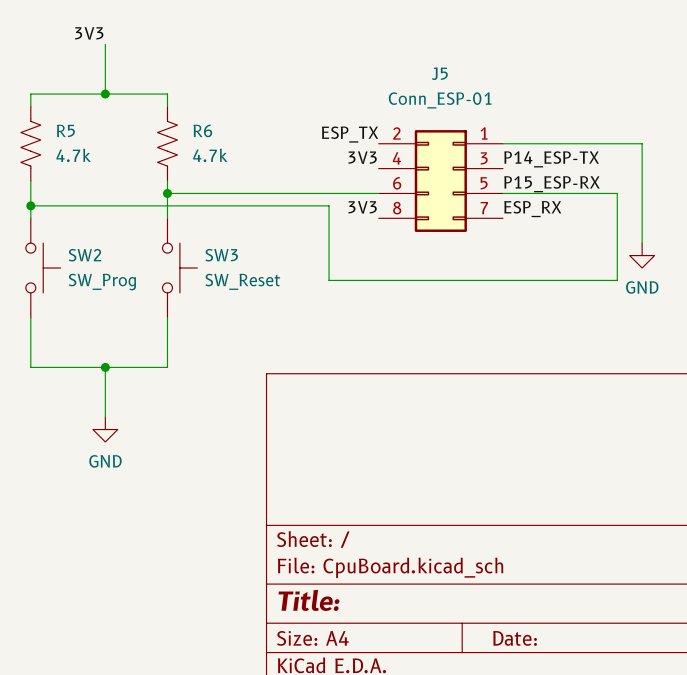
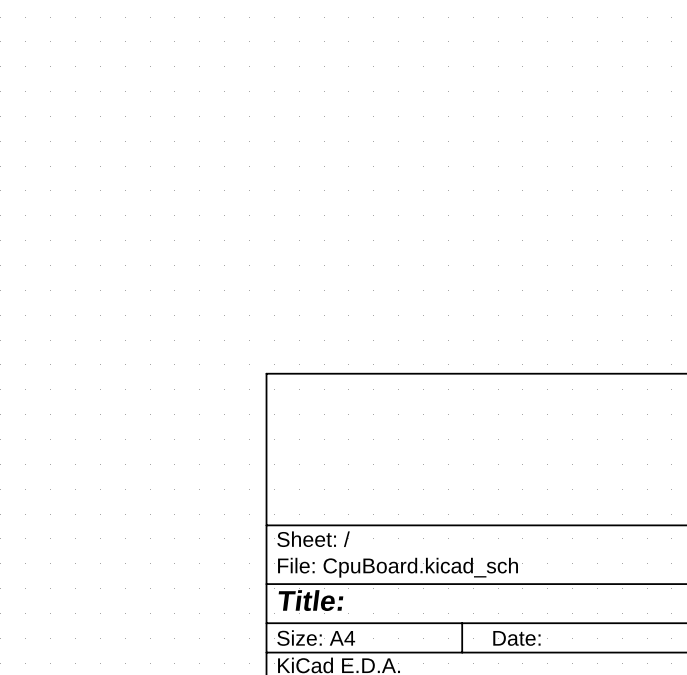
label: 3V3 (89, 33) -> none
wire: (105, 44) (105, 94) -> none
junction: (105, 94) -> none
wire: (30, 106) (30, 94) (167, 94) (167, 106) -> none
label: ESP_TX (350, 134) -> none
R5: 4.7k (30, 143) -> none
R6: 4.7k (167, 143) -> none
wire: (502, 143) (642, 143) (642, 243) -> none
label: 3V3 (362, 157) -> none
label: P14_ESP-TX (551, 159) -> none
wire: (30, 181) (30, 218) -> none
wire: (167, 181) (167, 218) -> none
J5: Conn_ESP-01 (440, 181) -> none
label: P15_ESP-RX (551, 184) -> none
wire: (167, 193) (378, 193) -> none
junction: (167, 193) -> none
wire: (502, 193) (617, 193) (617, 280) (329, 280) (329, 205) (30, 205) -> none
junction: (30, 205) -> none
label: 3V3 (362, 207) -> none
label: ESP_RX (532, 209) -> none
power symbol: GND (642, 255) -> none
SW2: SW_Prog (43, 268) -> none
SW3: SW_Reset (179, 268) -> none
wire: (30, 317) (30, 367) (167, 367) (167, 317) -> none
wire: (105, 367) (105, 417) -> none
junction: (105, 367) -> none
power symbol: GND (105, 429) -> none

